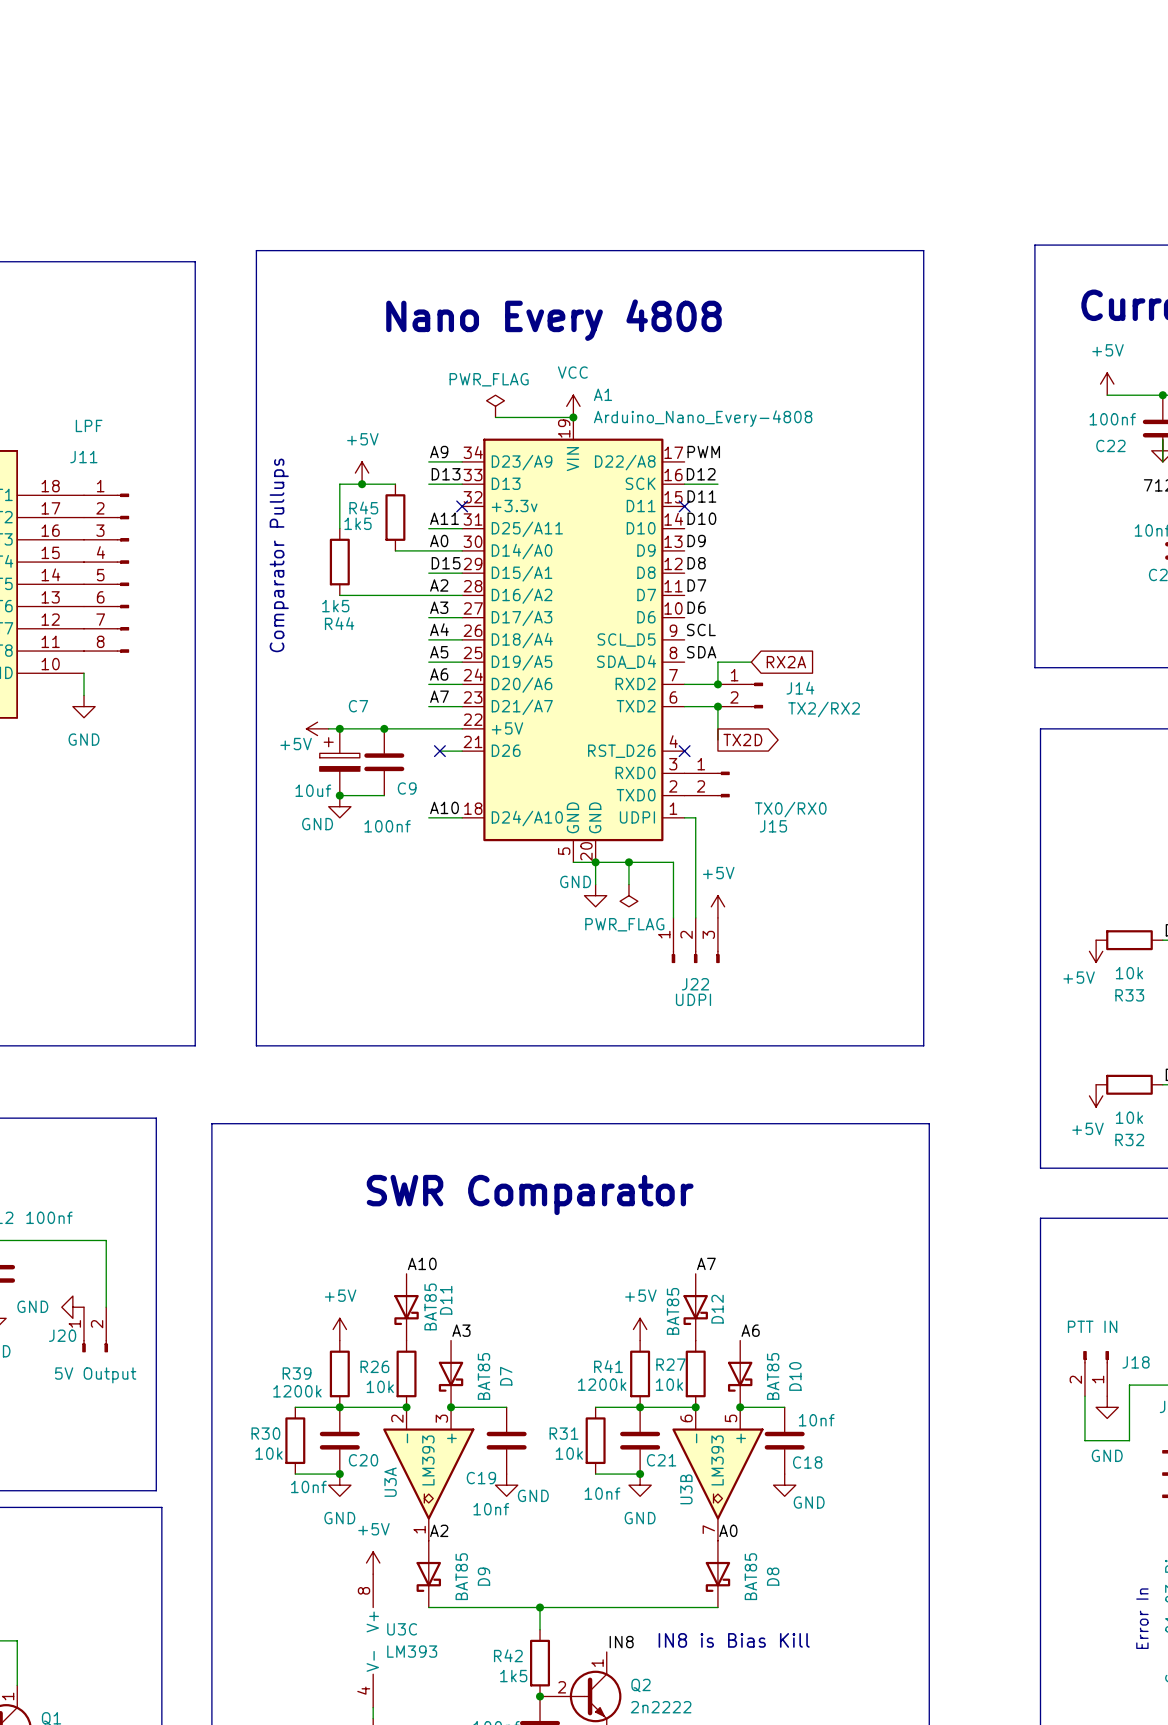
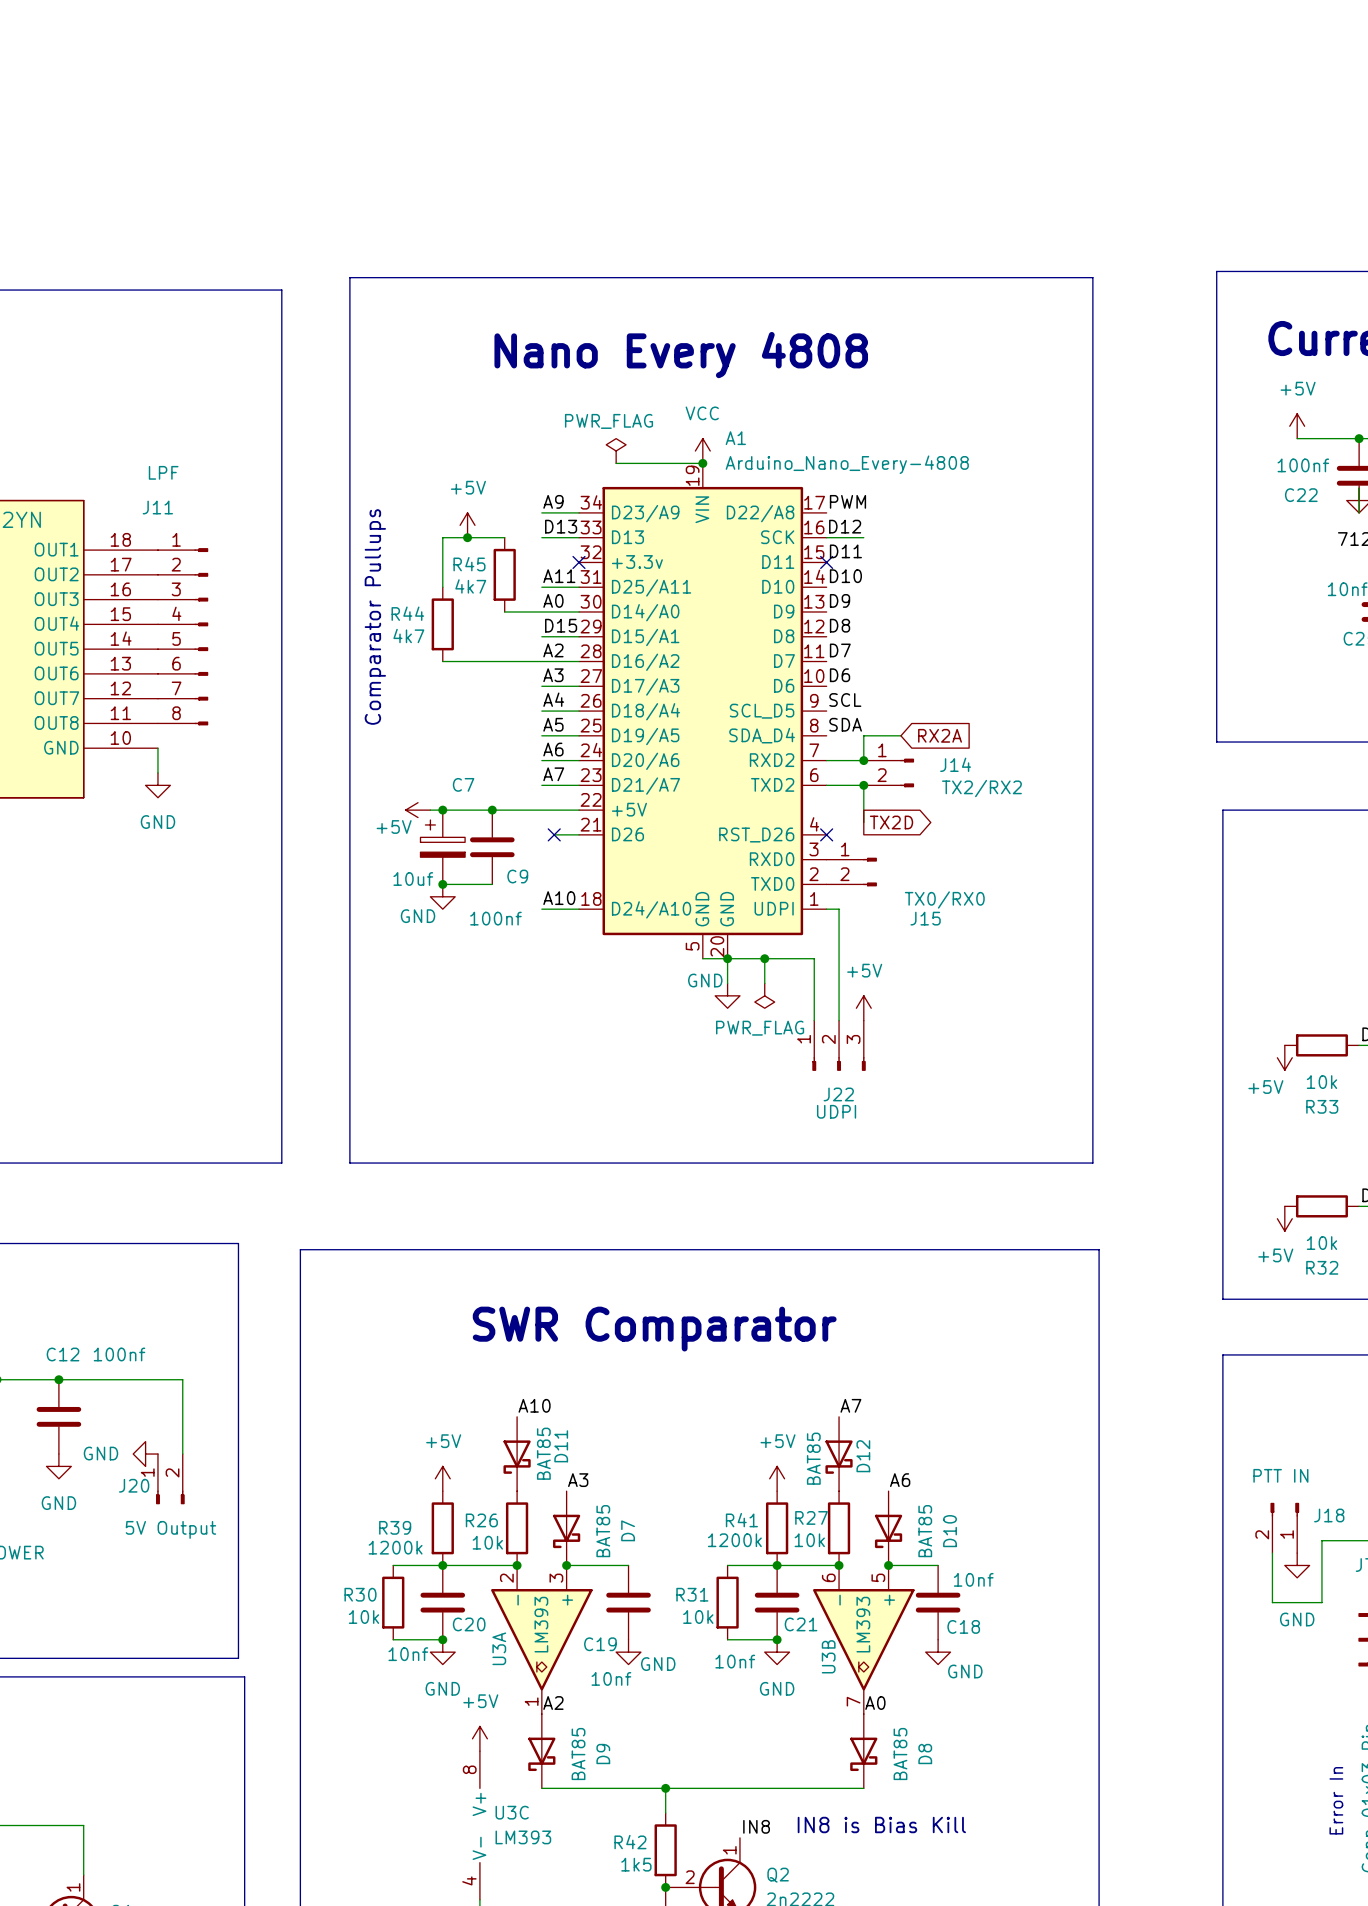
R45 value: 1k5 (358, 523) -> 4k7 (470, 586)
R44 value: 1k5 (335, 606) -> 4k7 (408, 636)
R44 name position: R44 (339, 623) -> R44 (407, 613)

